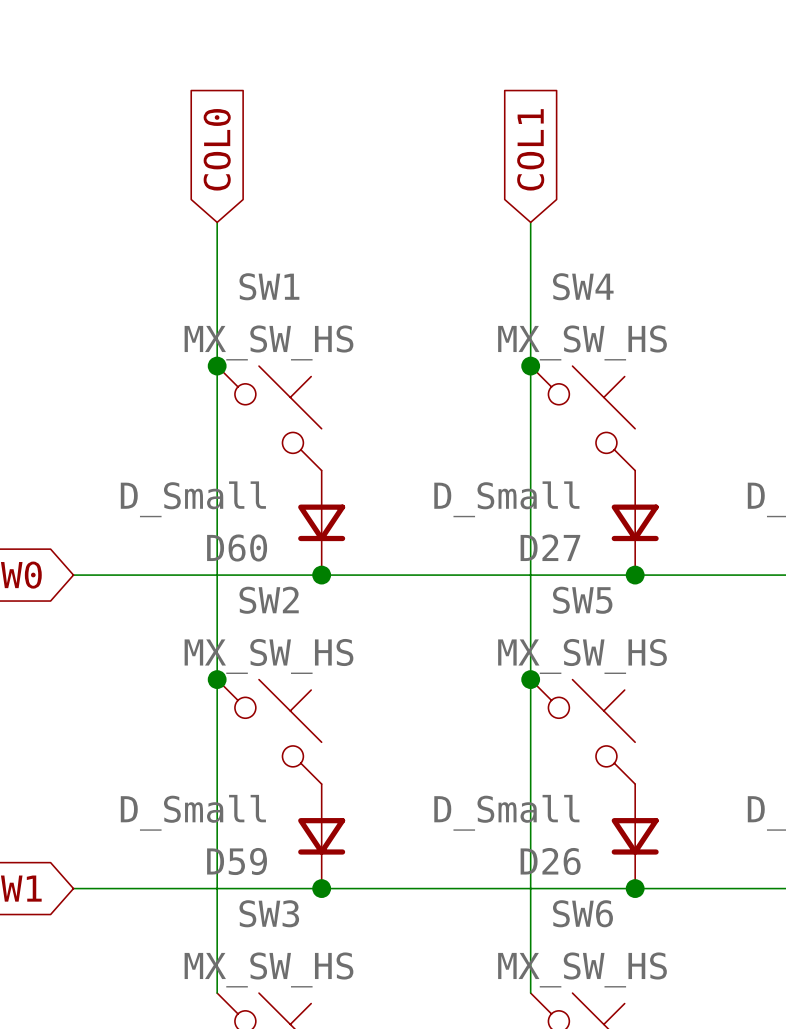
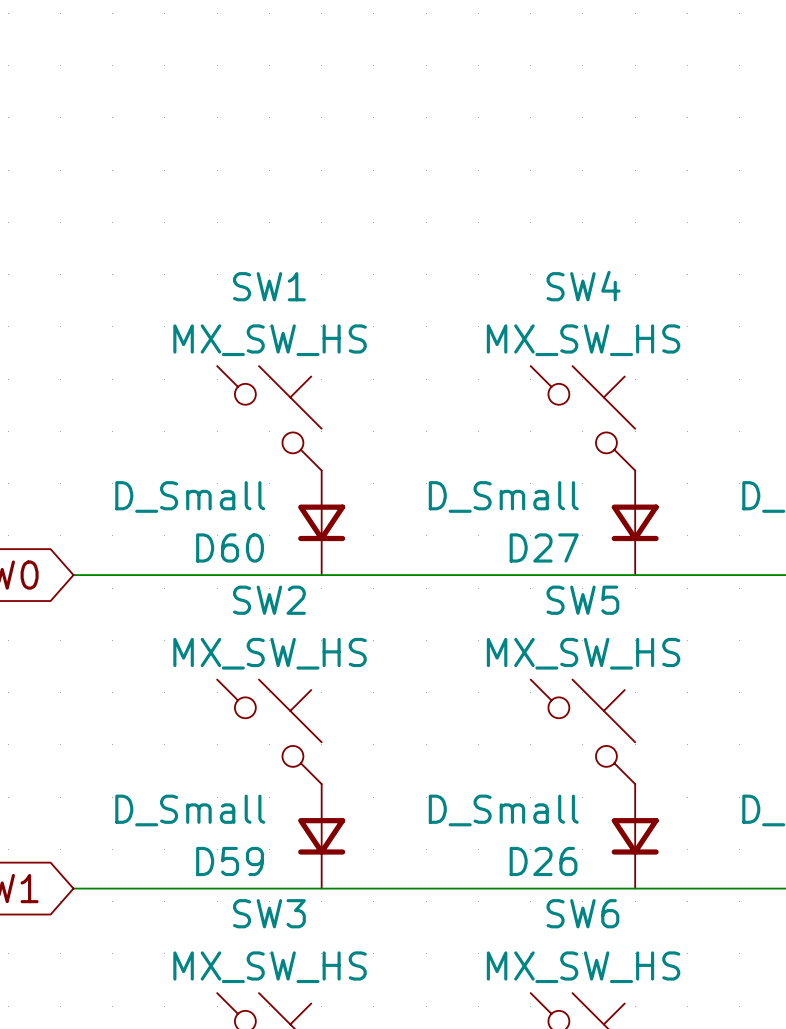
global label: COL0 (217, 149) -> none
global label: COL1 (530, 149) -> none
wire: (217, 222) (217, 993) -> none
wire: (530, 222) (530, 993) -> none
junction: (217, 366) -> none
junction: (530, 366) -> none
junction: (321, 575) -> none
junction: (635, 575) -> none
junction: (217, 679) -> none
junction: (530, 679) -> none
junction: (321, 888) -> none
junction: (635, 888) -> none

